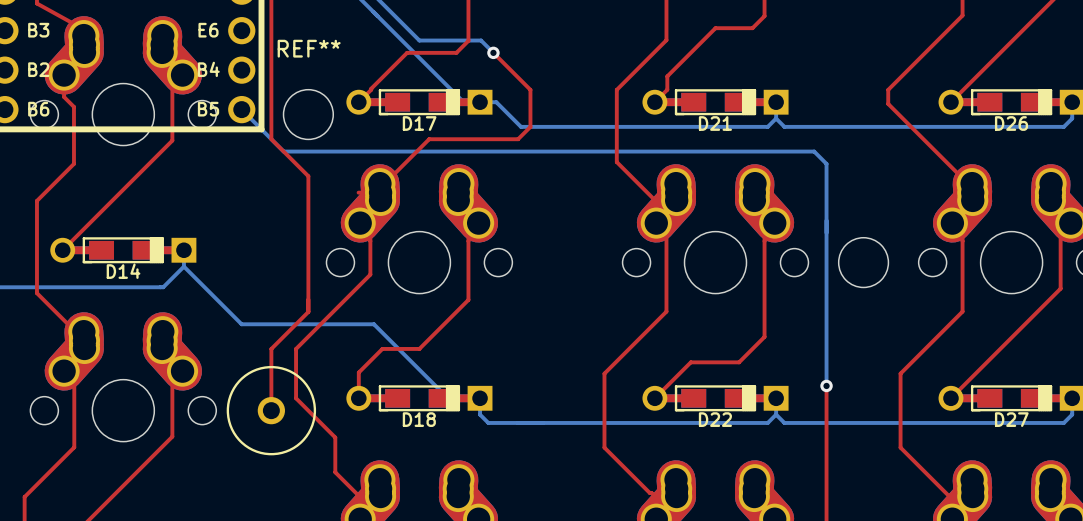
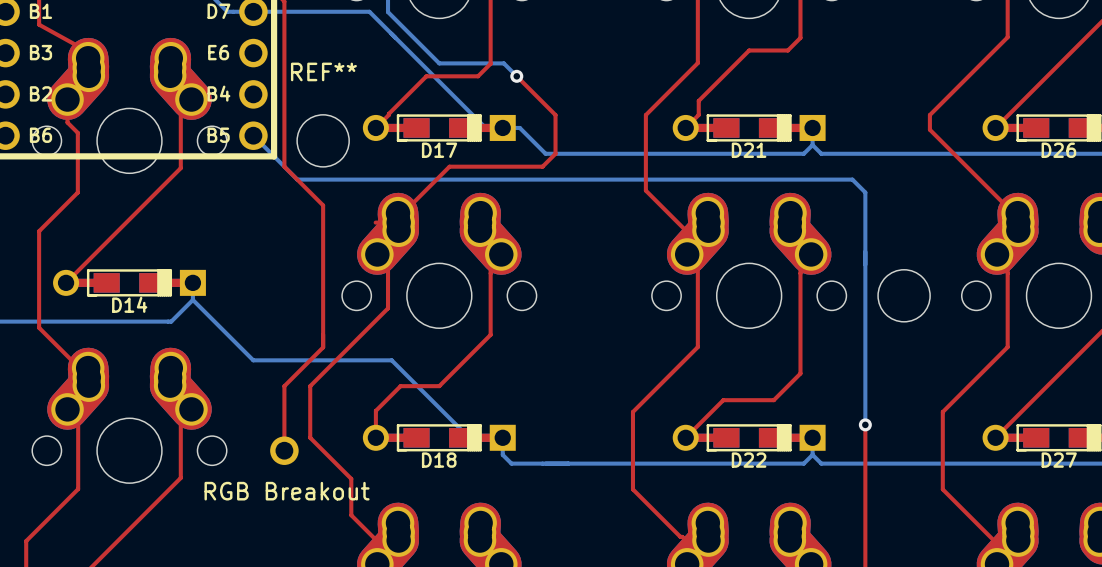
part footprint: [226, 365, 317, 456] -> [270, 436, 299, 465]
text: none -> RGB Breakout (287, 491)

